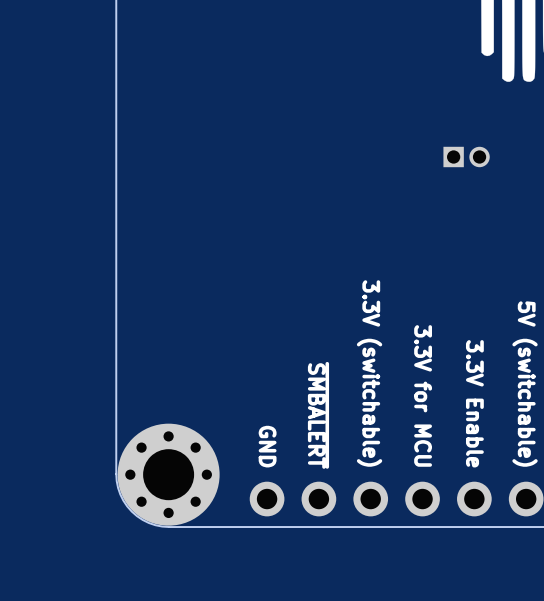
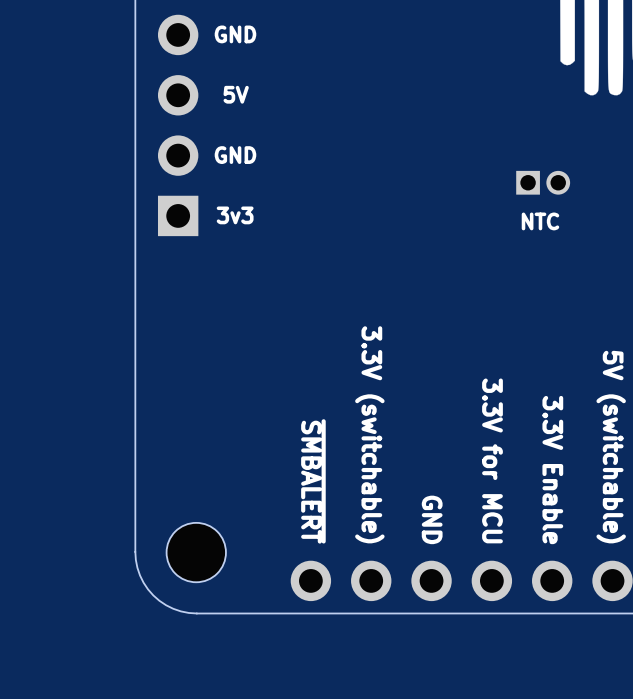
text: none -> GND (235, 34)
text: none -> 5V (236, 94)
part: none -> (178, 125)
text: none -> GND (235, 155)
text: none -> 3v3 (235, 215)
text: none -> NTC (540, 221)
text position: 3.3V (switchable) (369, 373) -> 3.3V (switchable) (369, 434)
text position: ~{SMBALERT} (318, 415) -> ~{SMBALERT} (313, 481)
part footprint: [117, 423, 220, 526] -> [166, 522, 226, 583]
text position: GND (267, 446) -> GND (432, 519)

